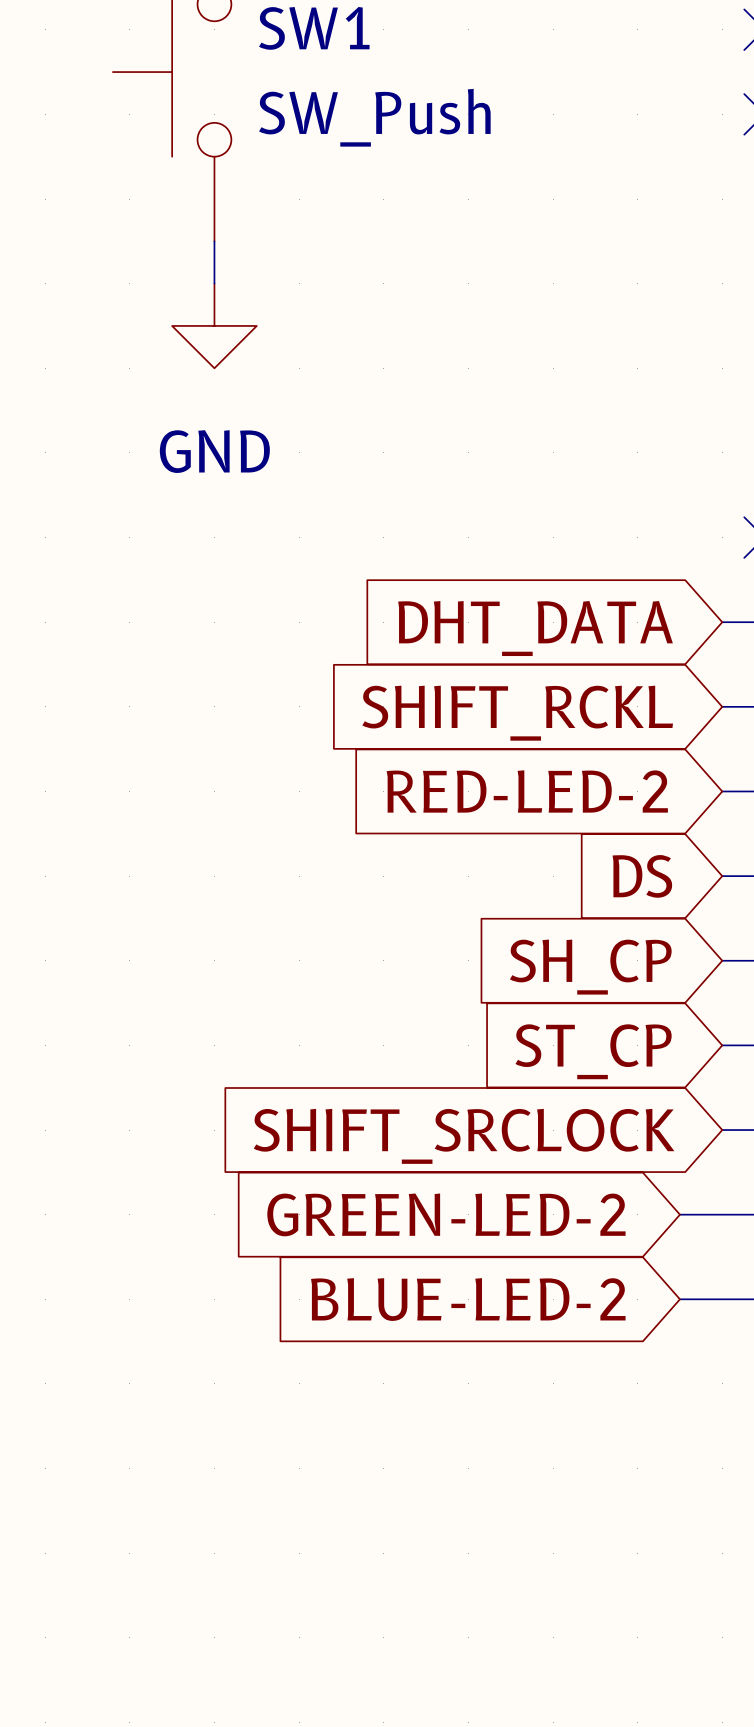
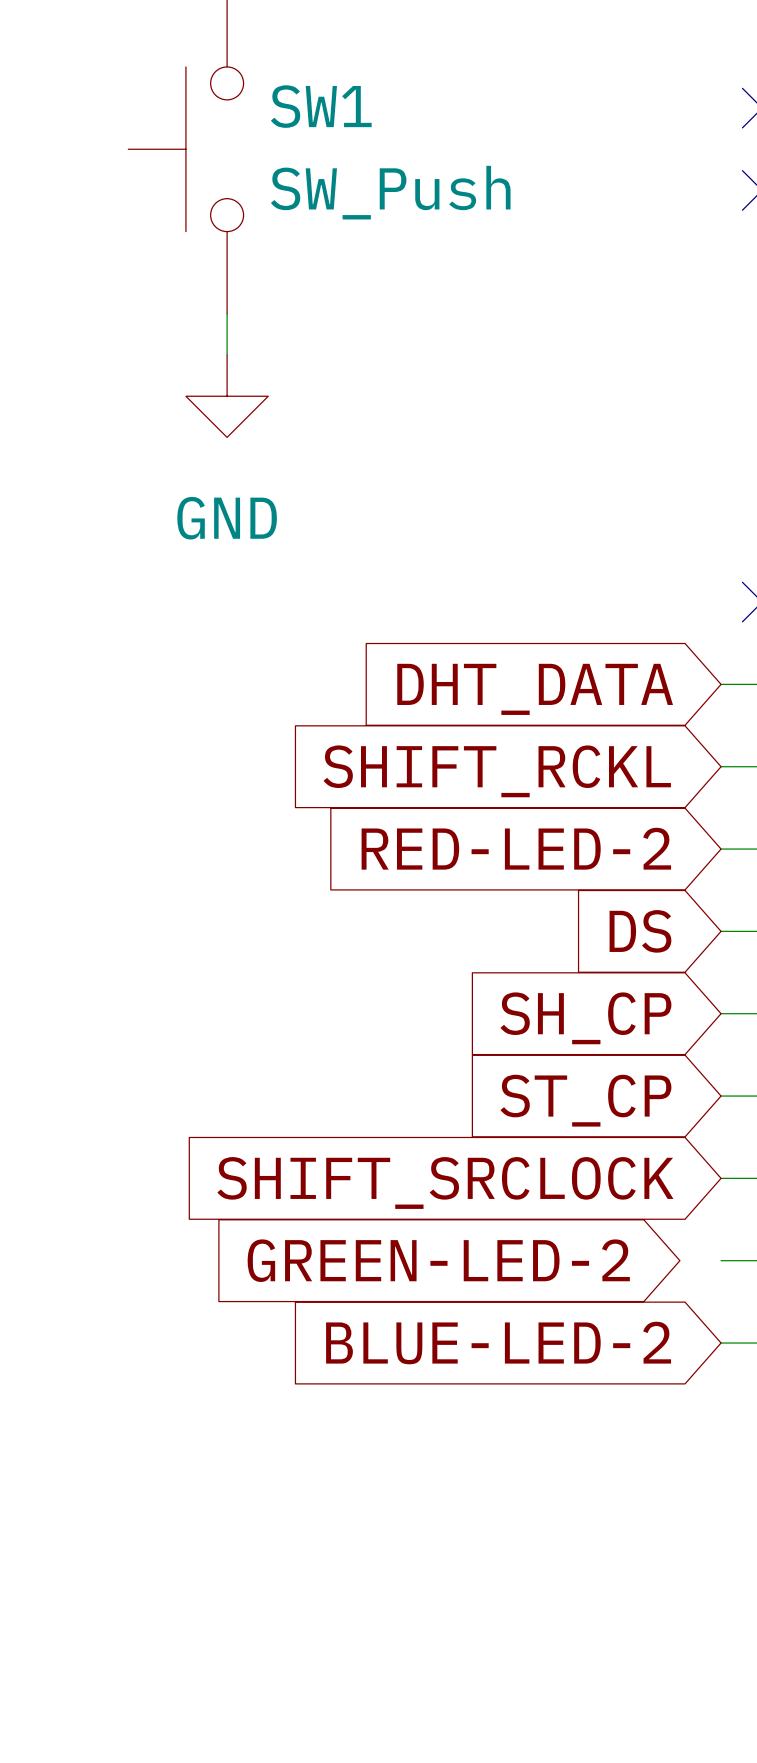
wire: (679, 1214) (722, 1214) -> none
global label position: BLUE-LED-2 (468, 1299) -> BLUE-LED-2 (498, 1343)
wire: (679, 1299) (722, 1299) -> none

